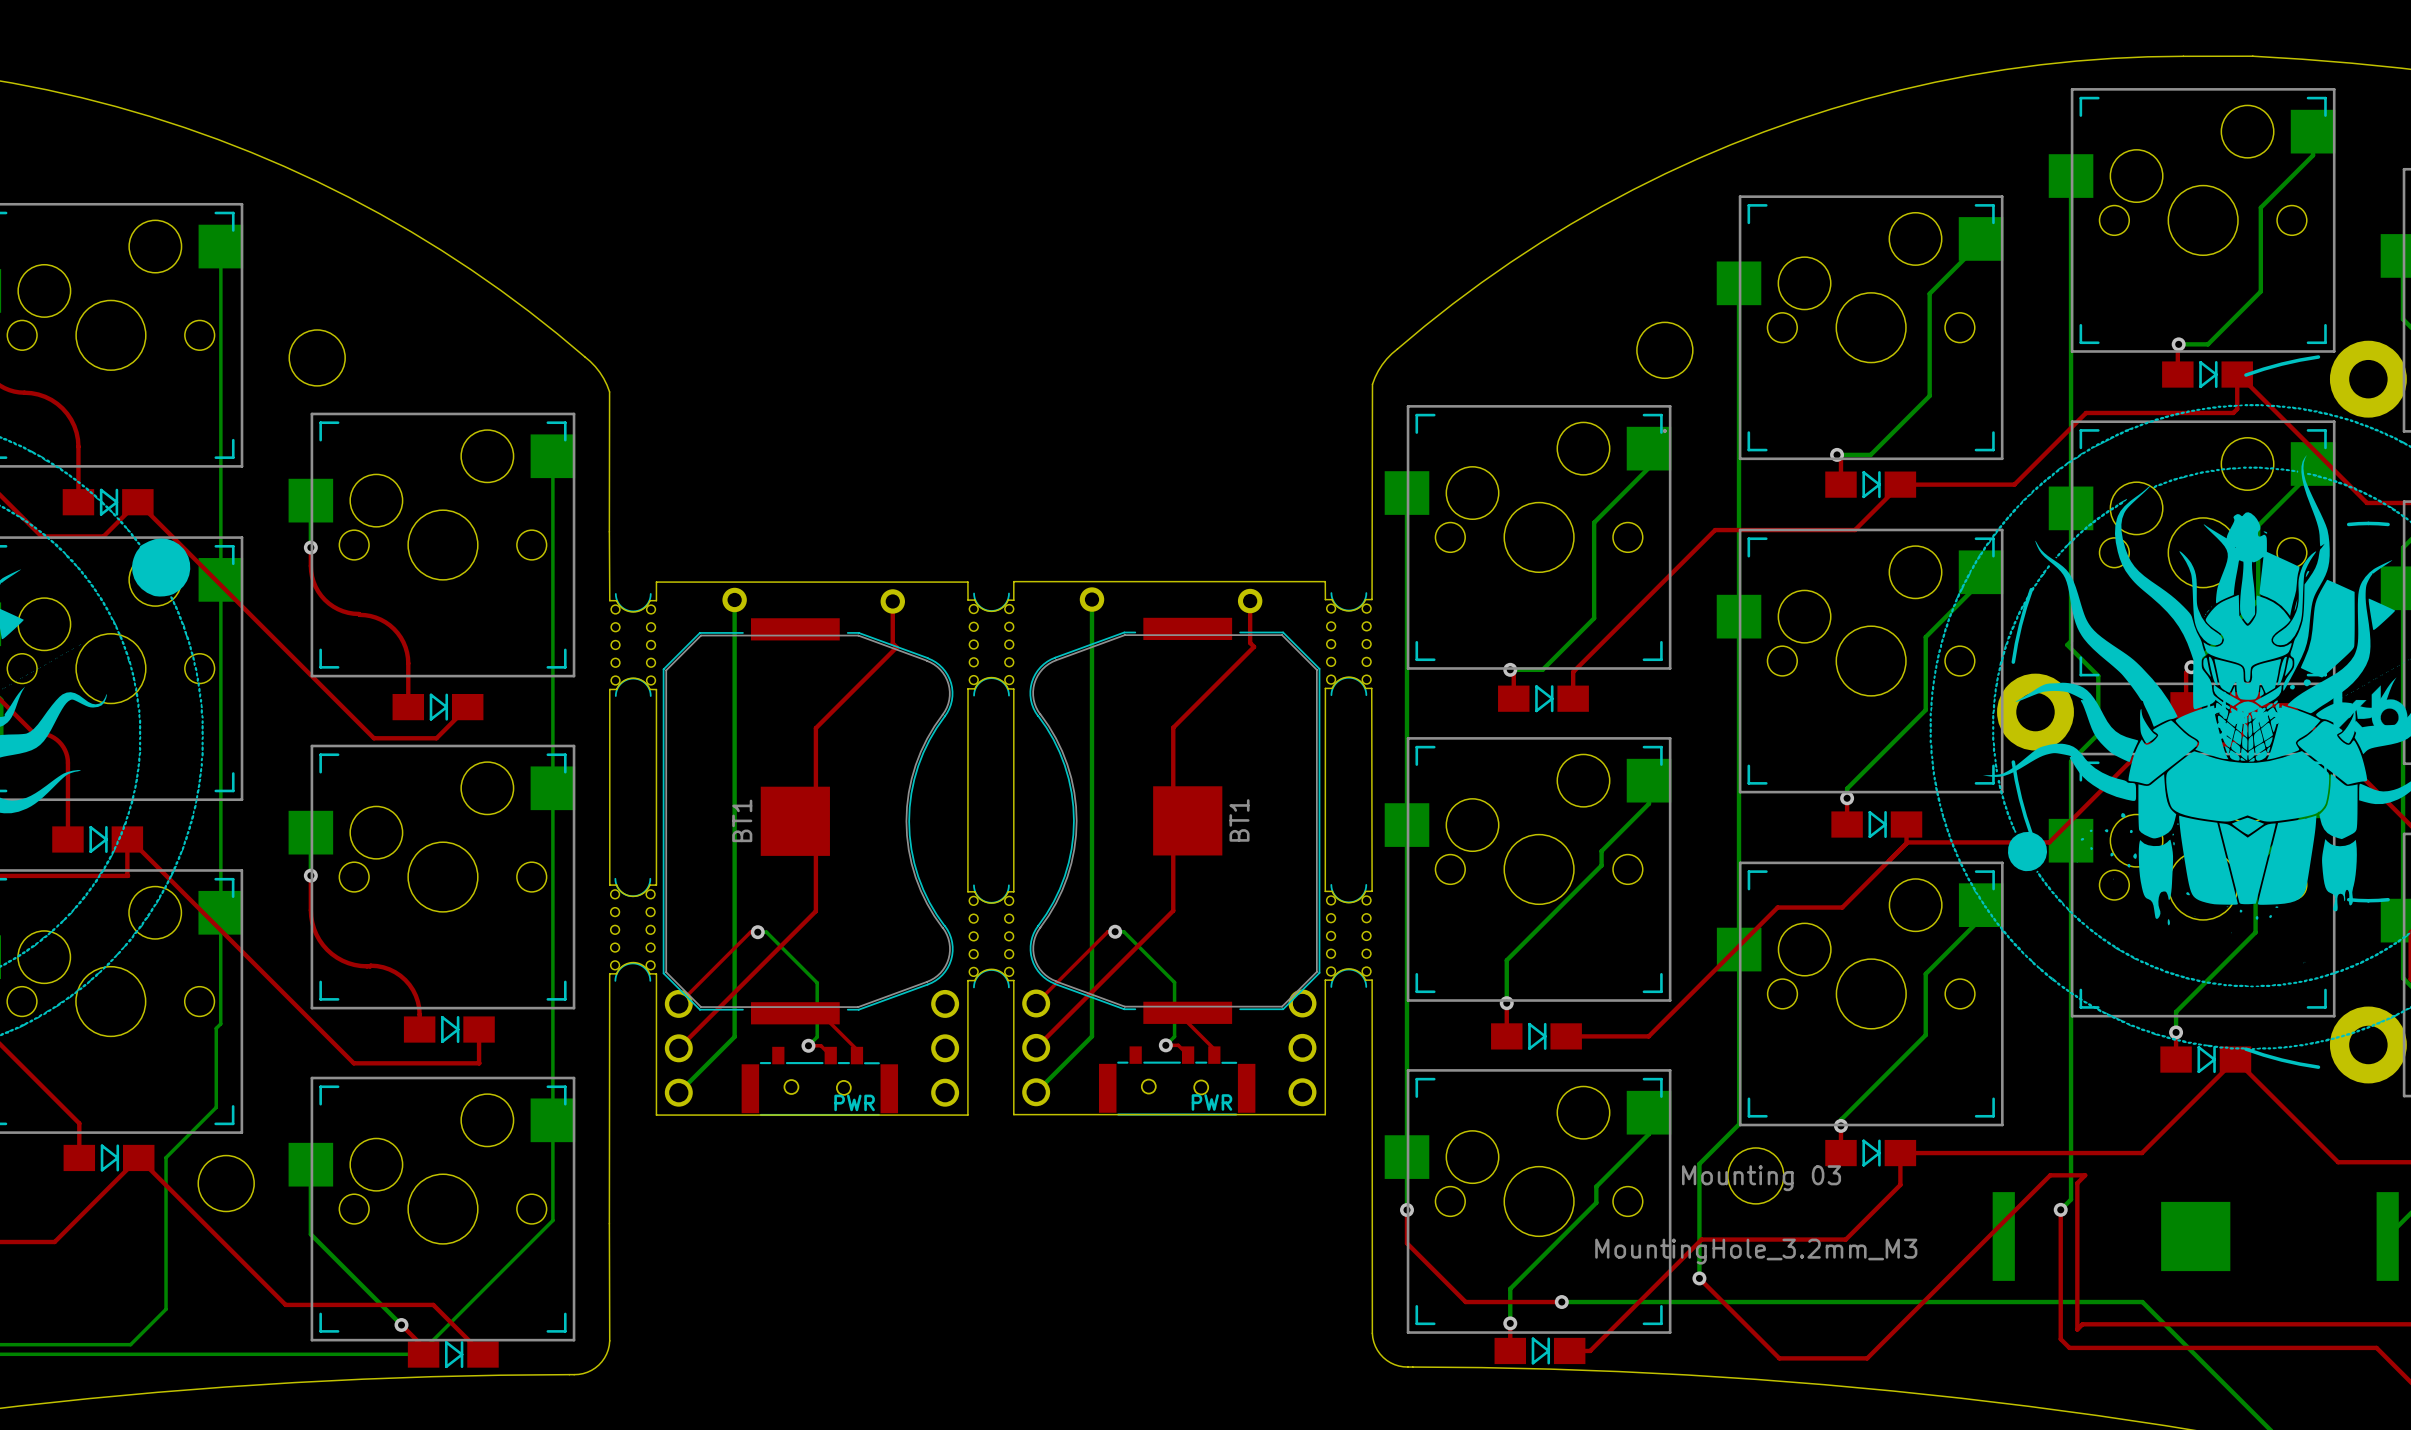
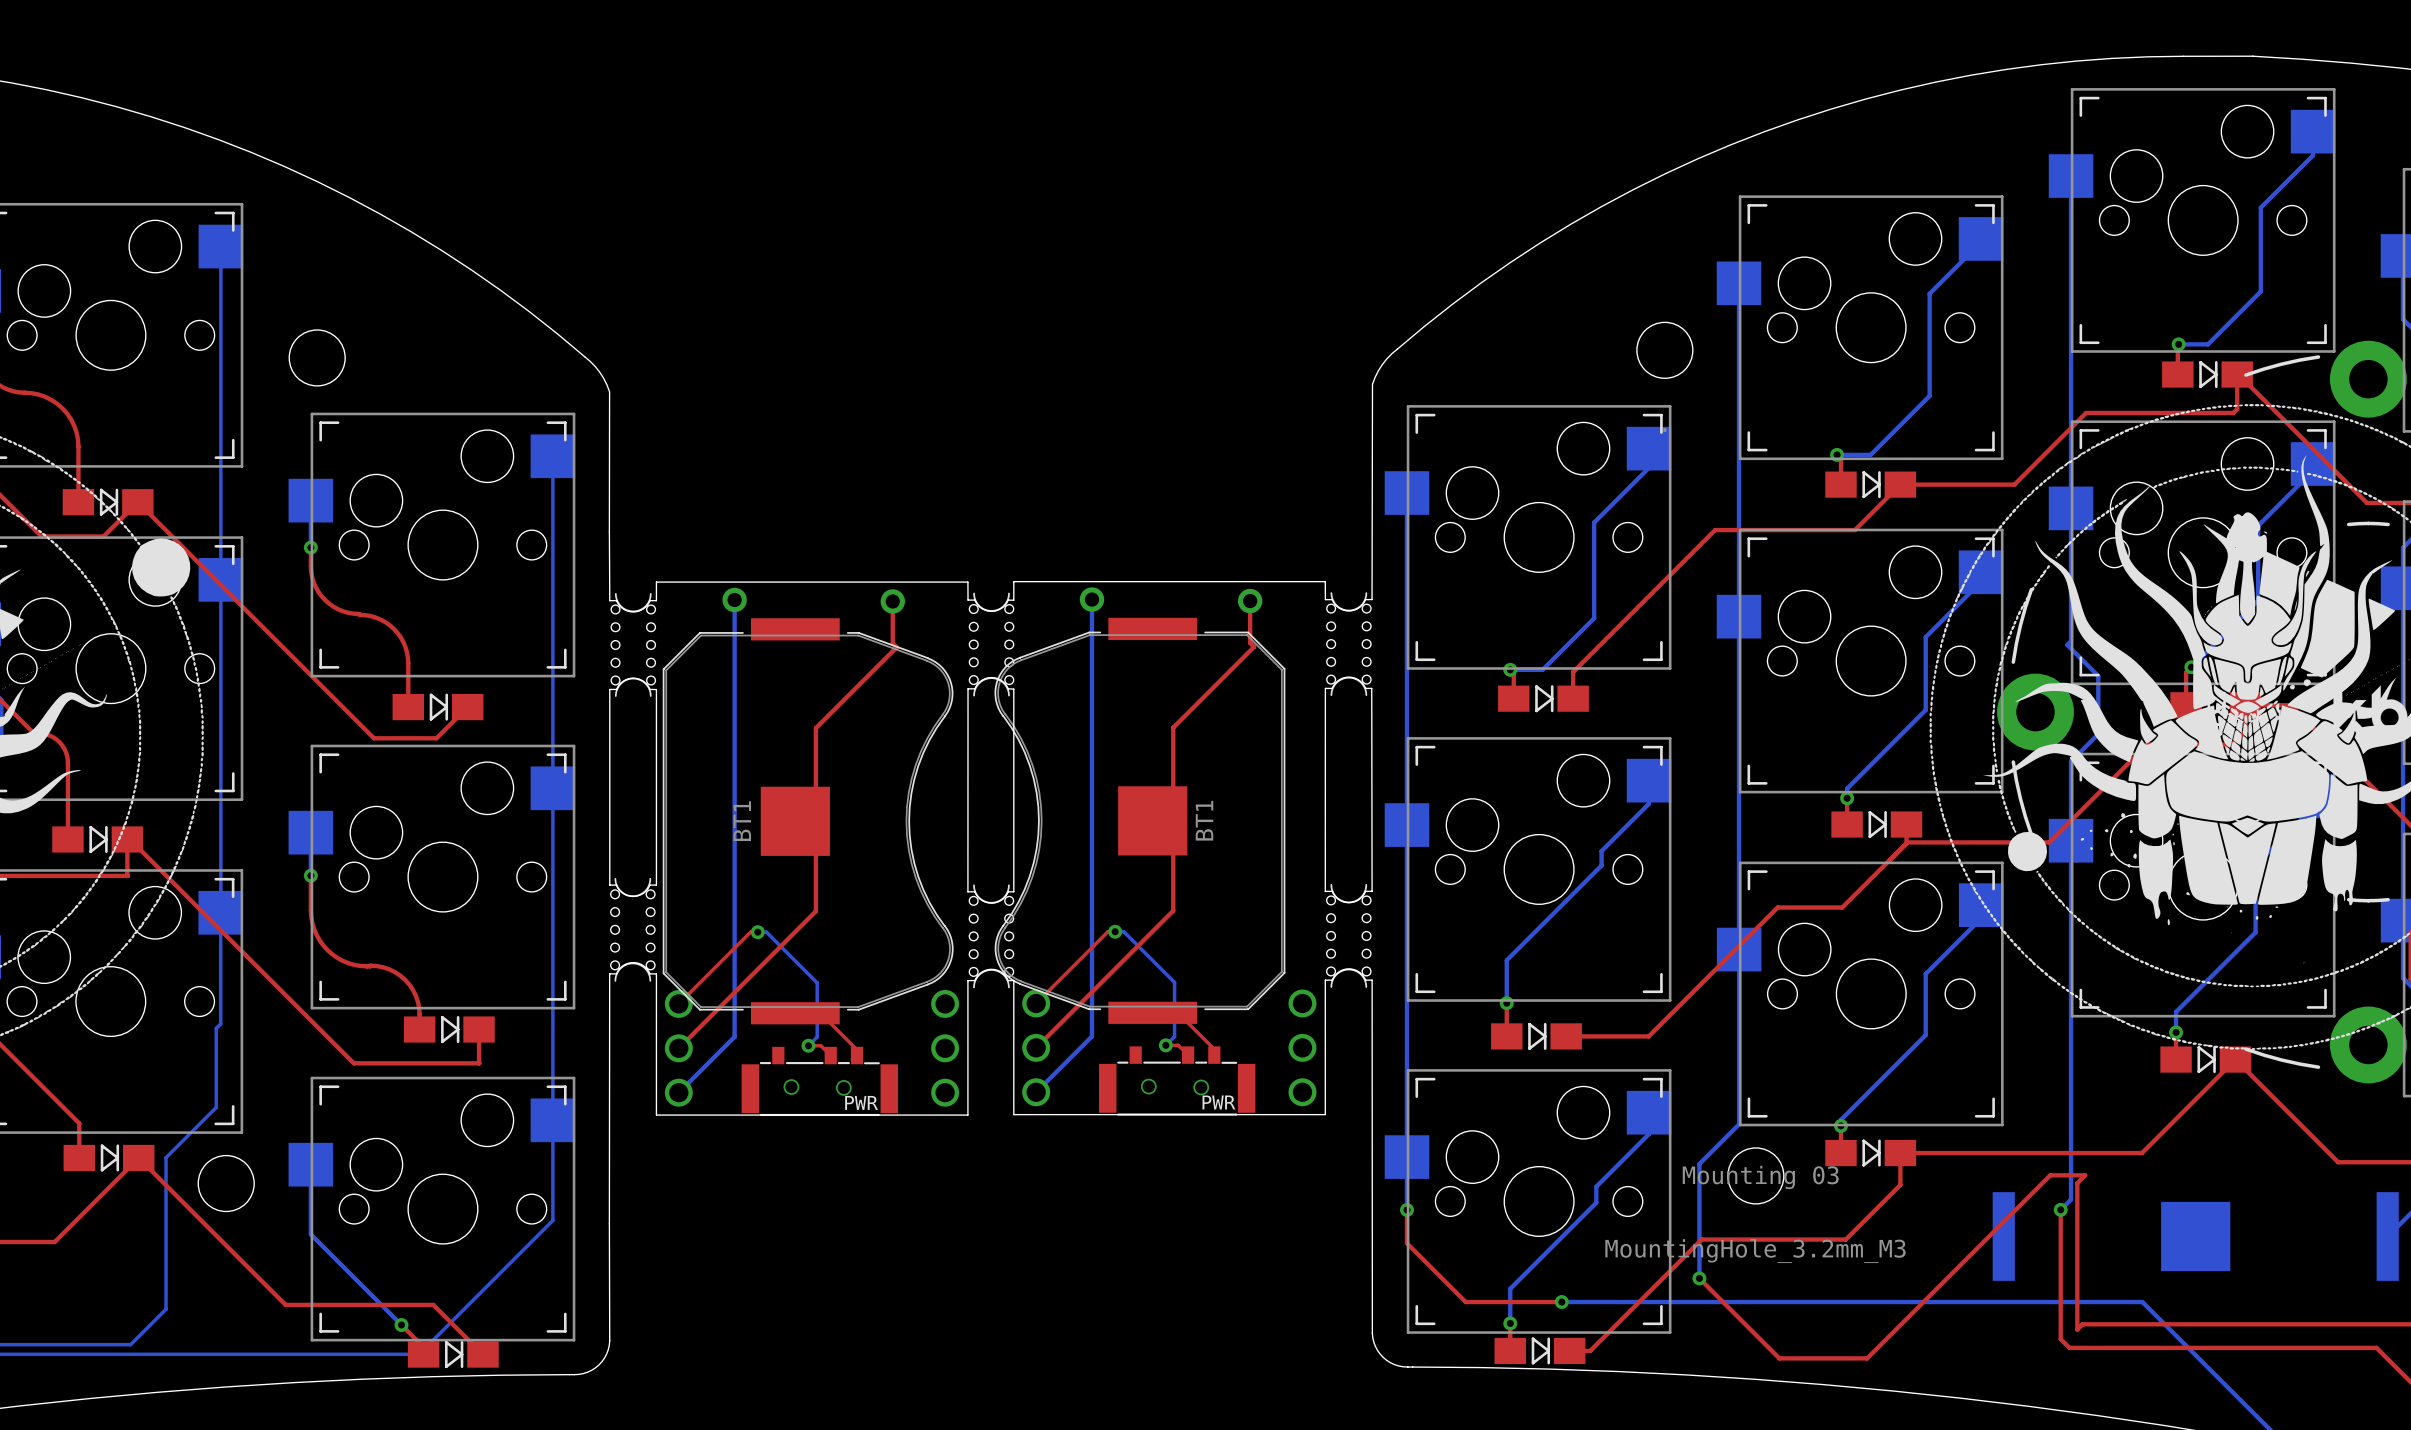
BT1 position: (1174, 820) -> (1139, 820)

